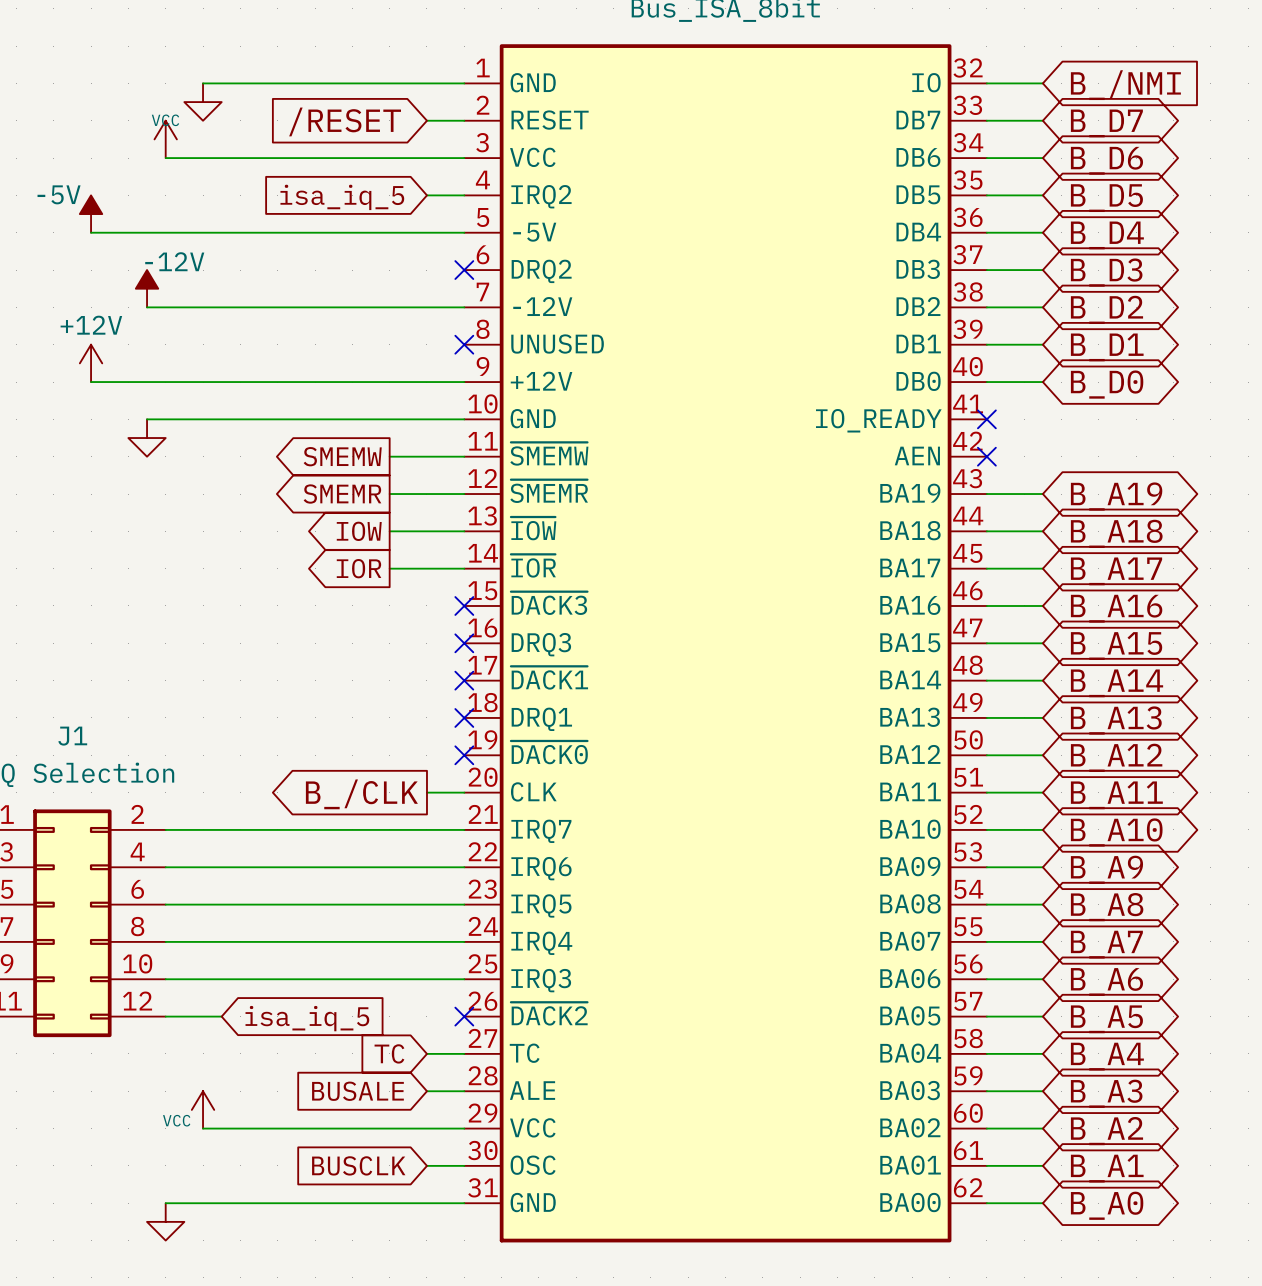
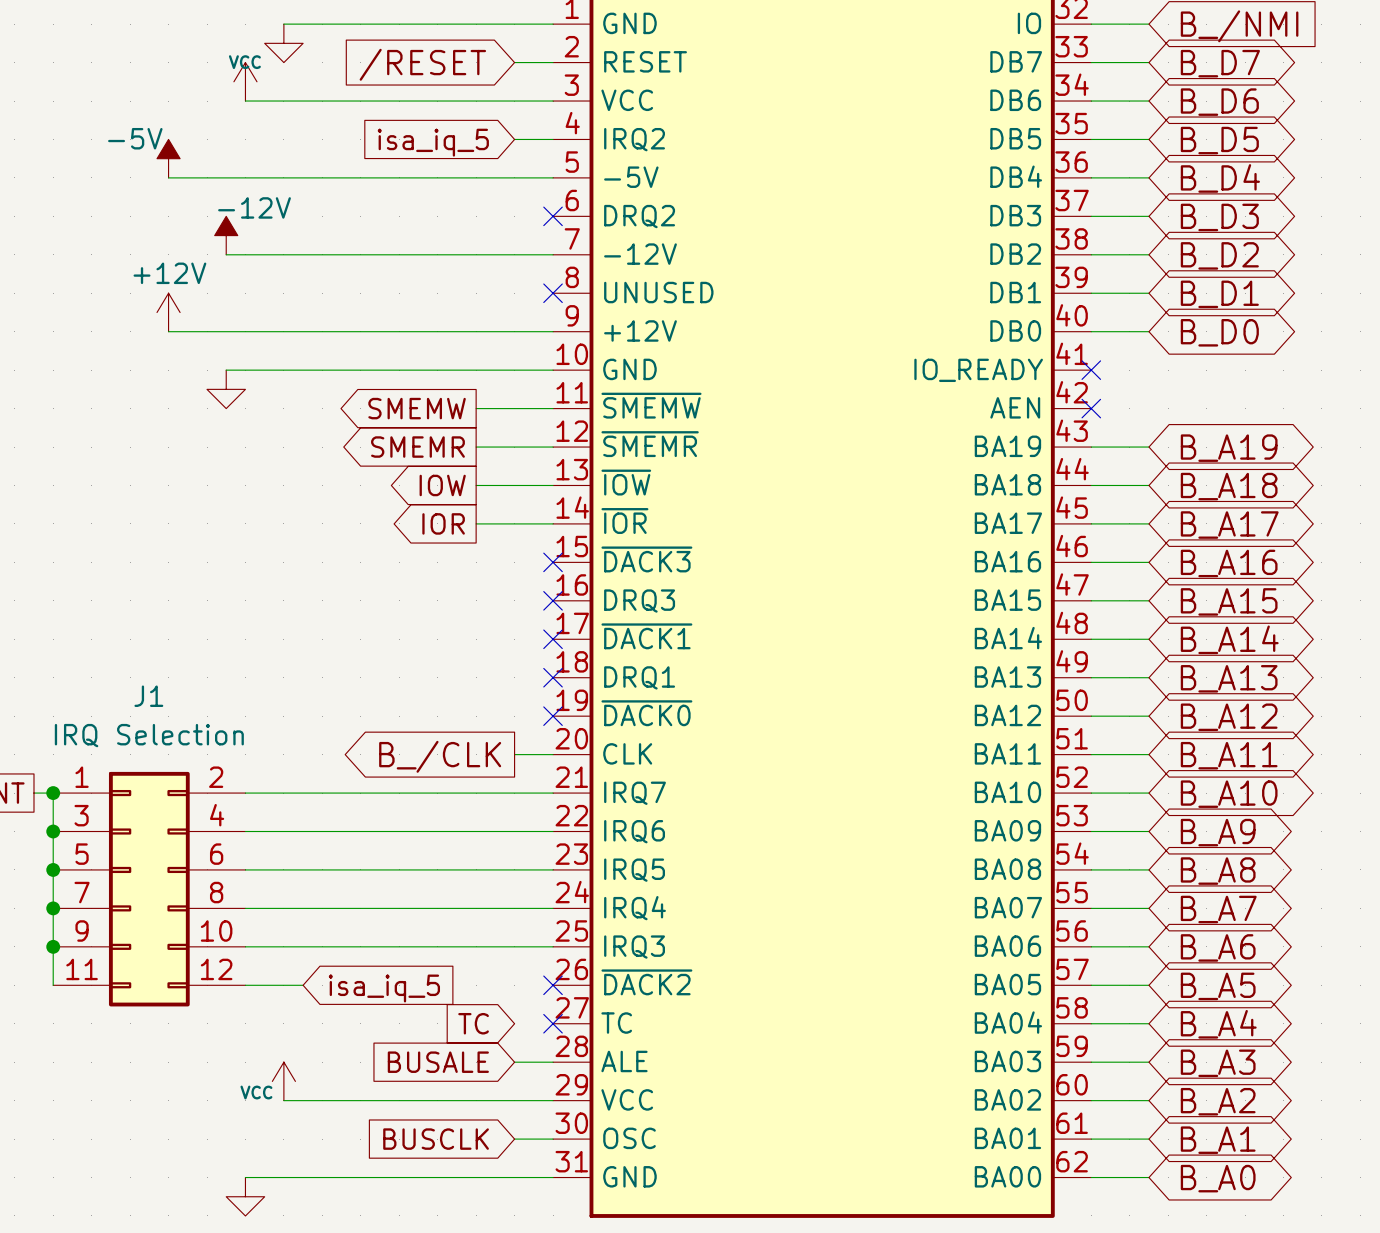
wire: (426, 1053) (464, 1053) -> none
no-connect mark: none -> (553, 1023)

